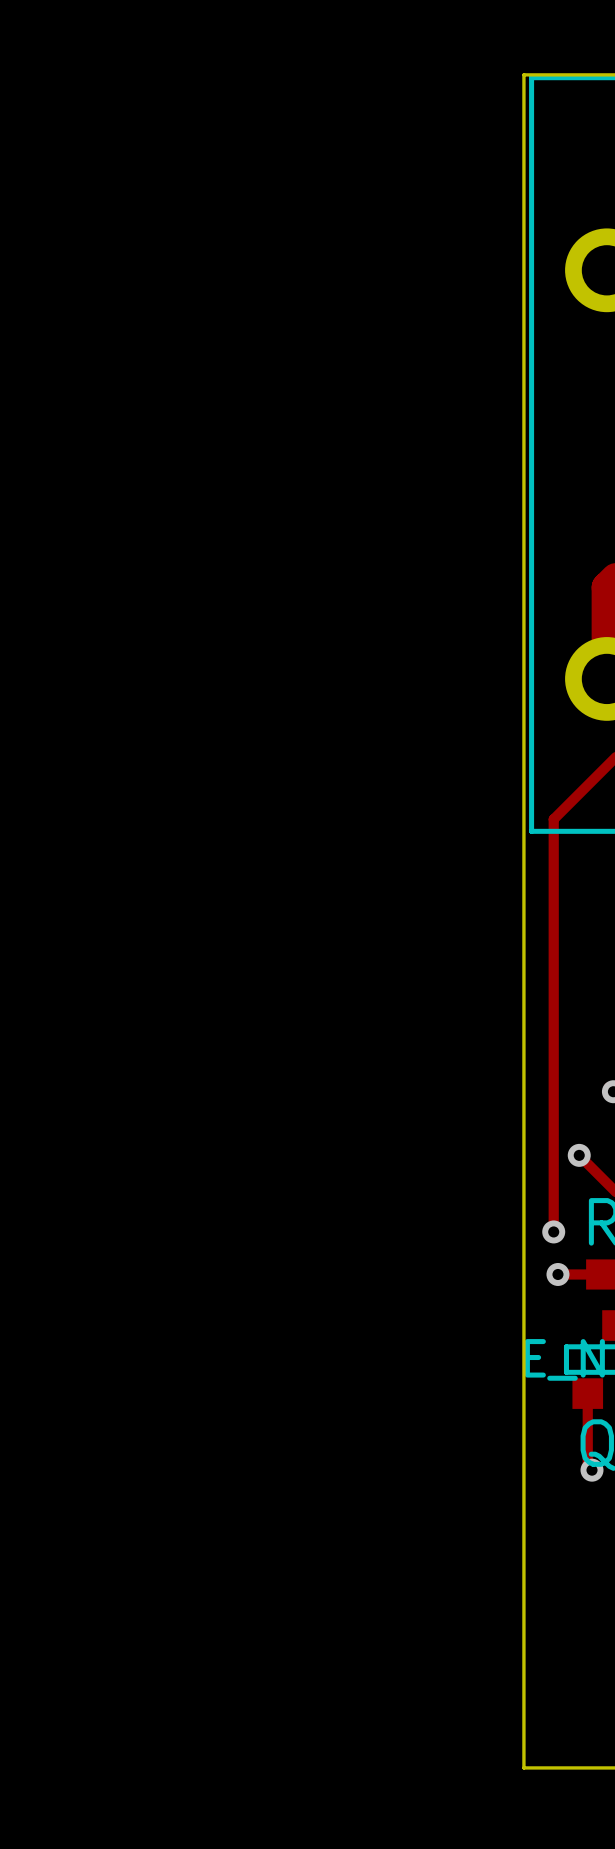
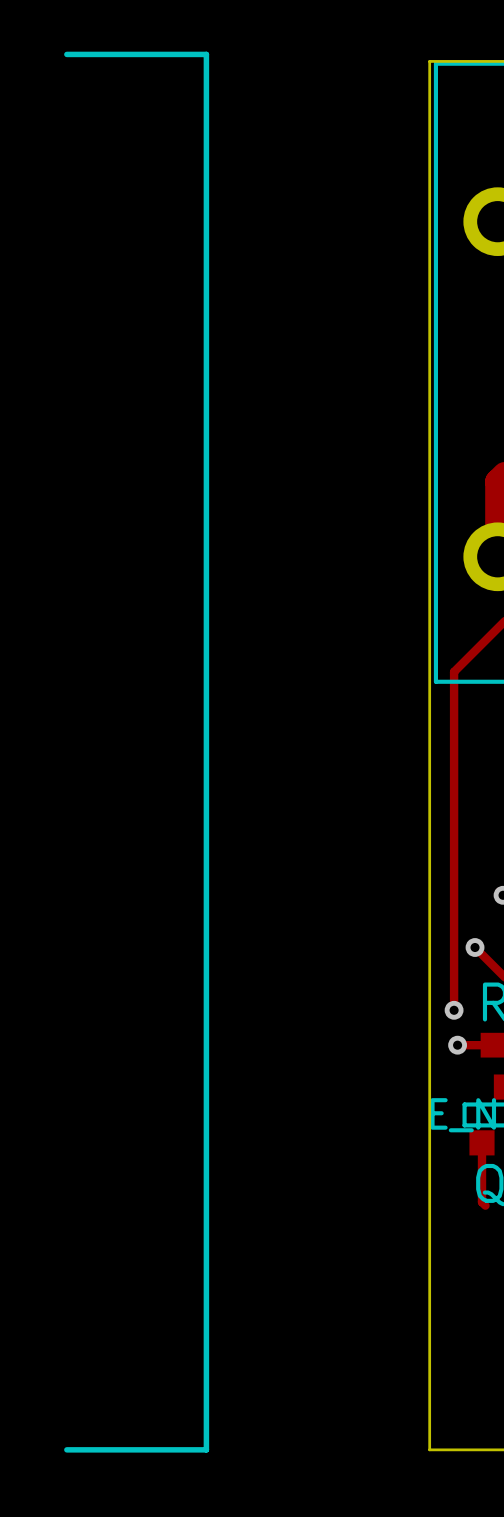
line: none -> (66, 54) (206, 54) (206, 1449) (66, 1449)
via: (592, 1470) -> none

